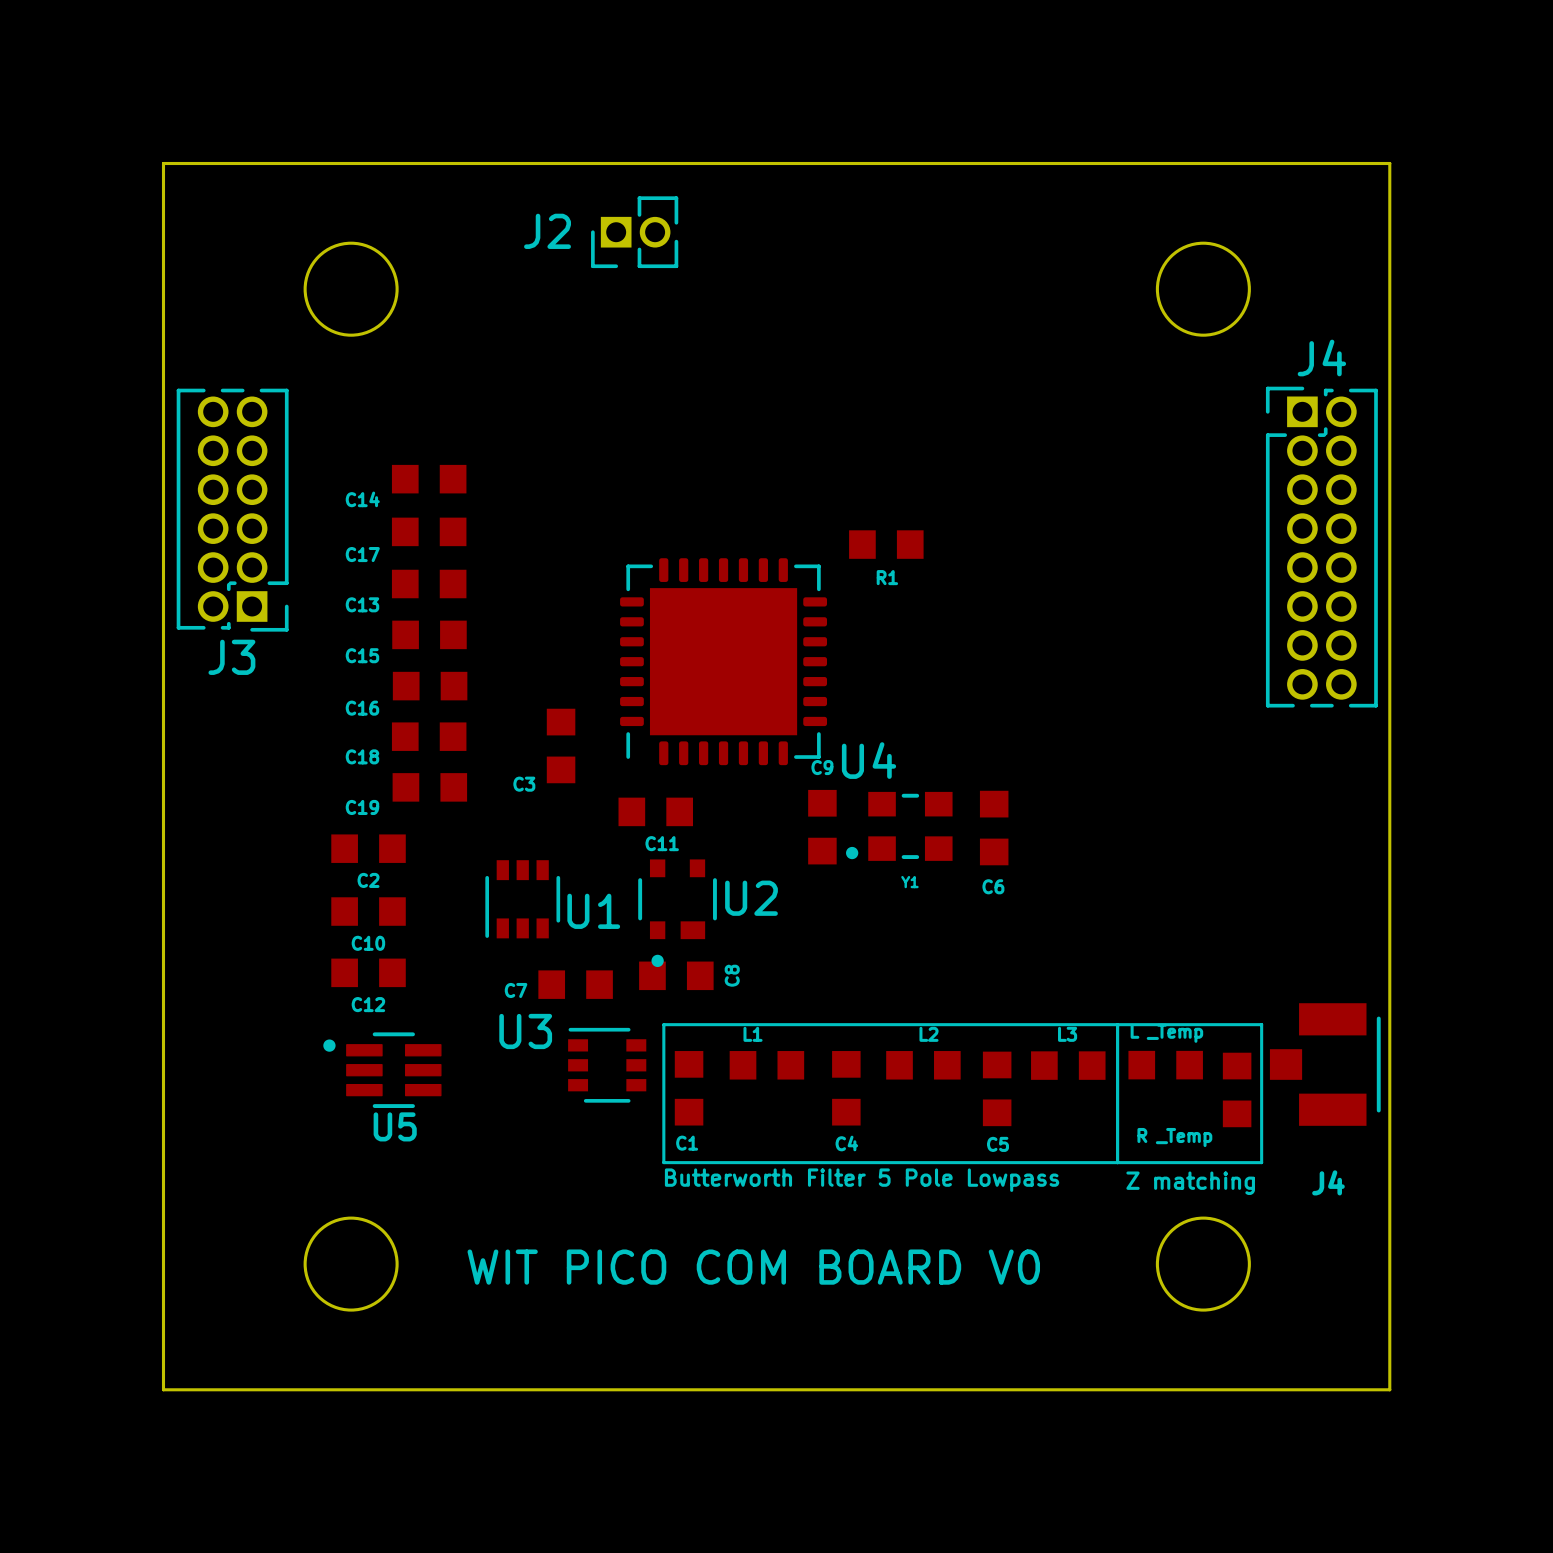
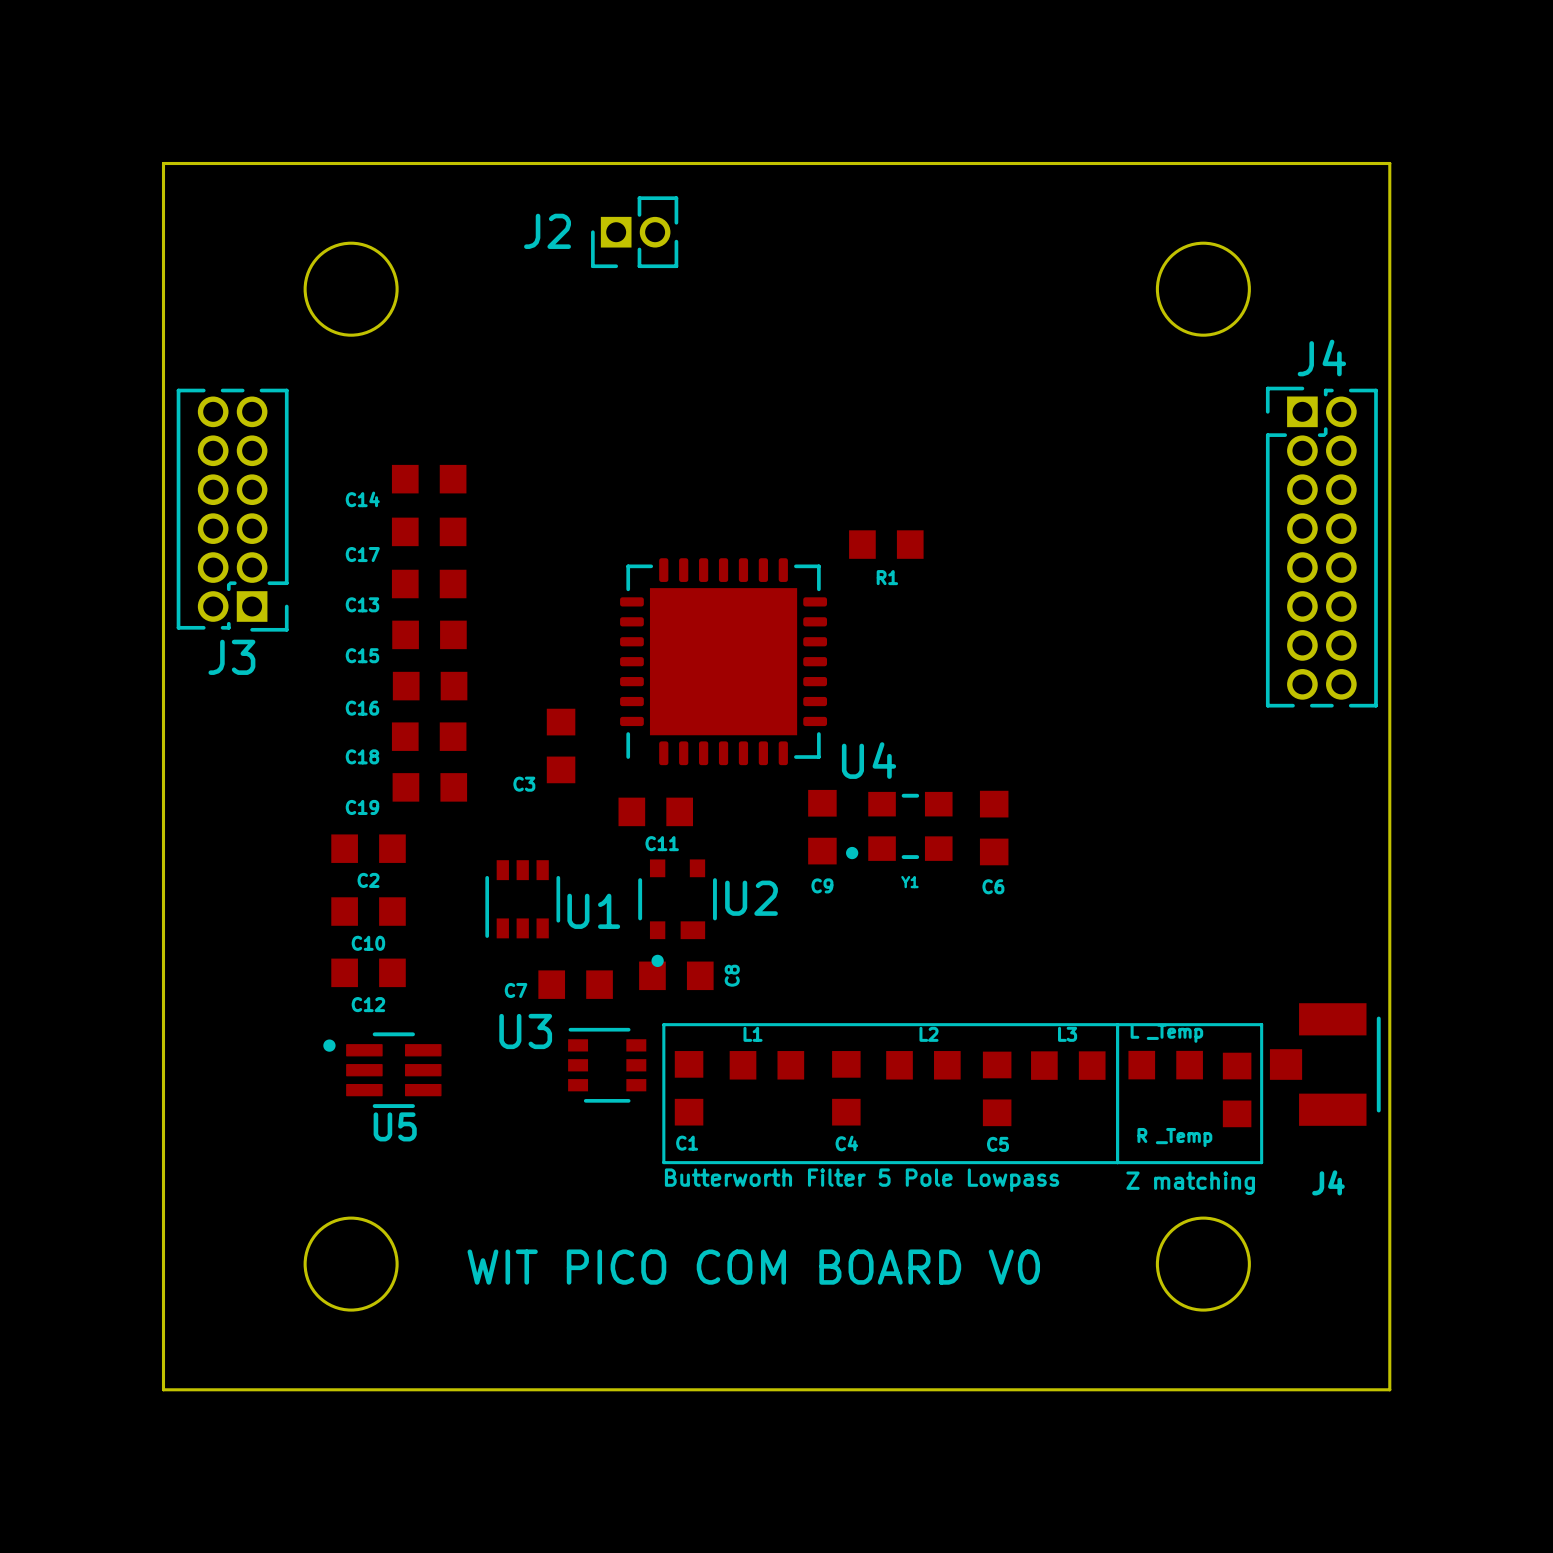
C9 name position: C9 (822, 767) -> C9 (822, 885)

